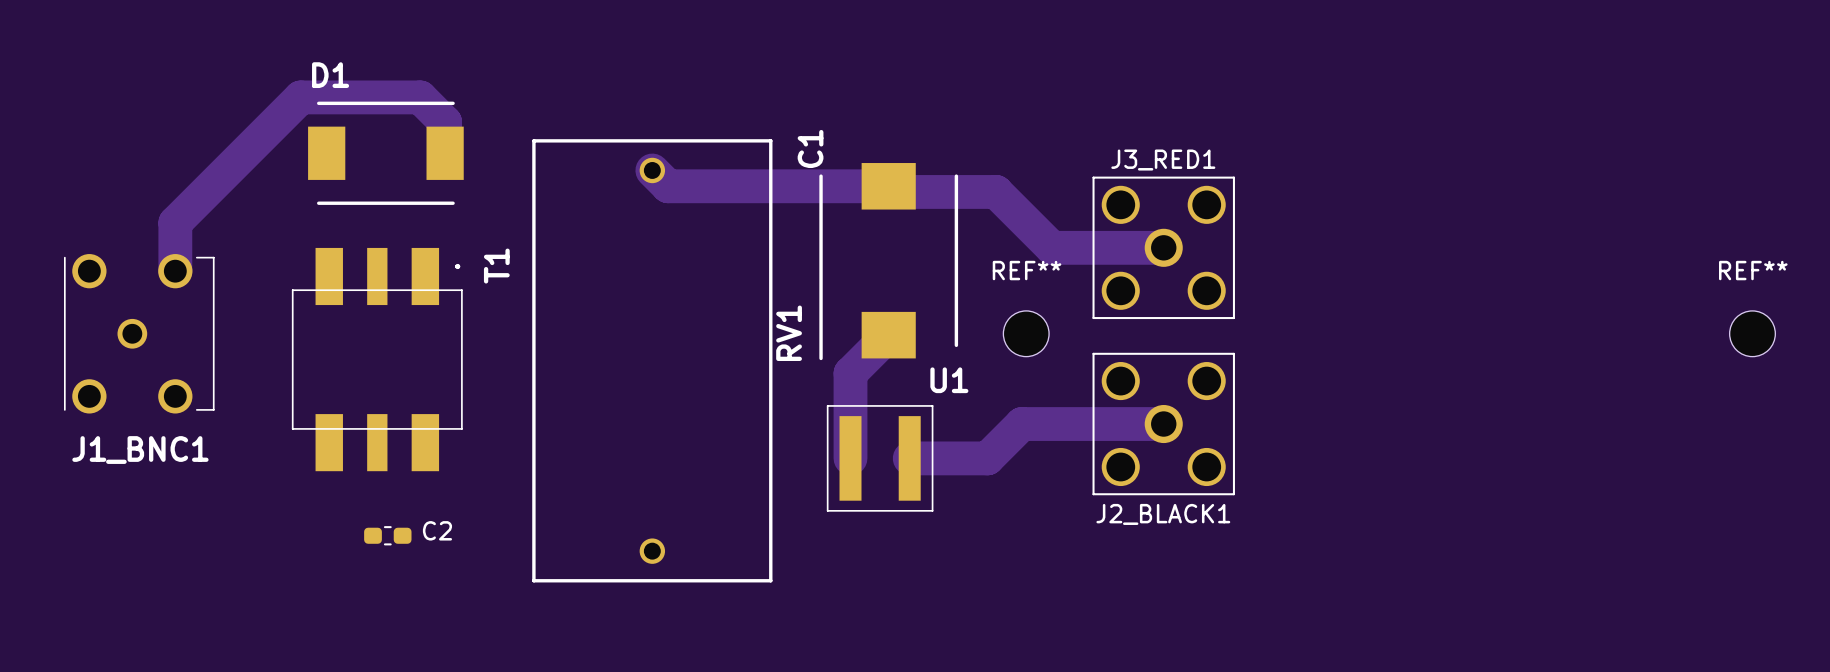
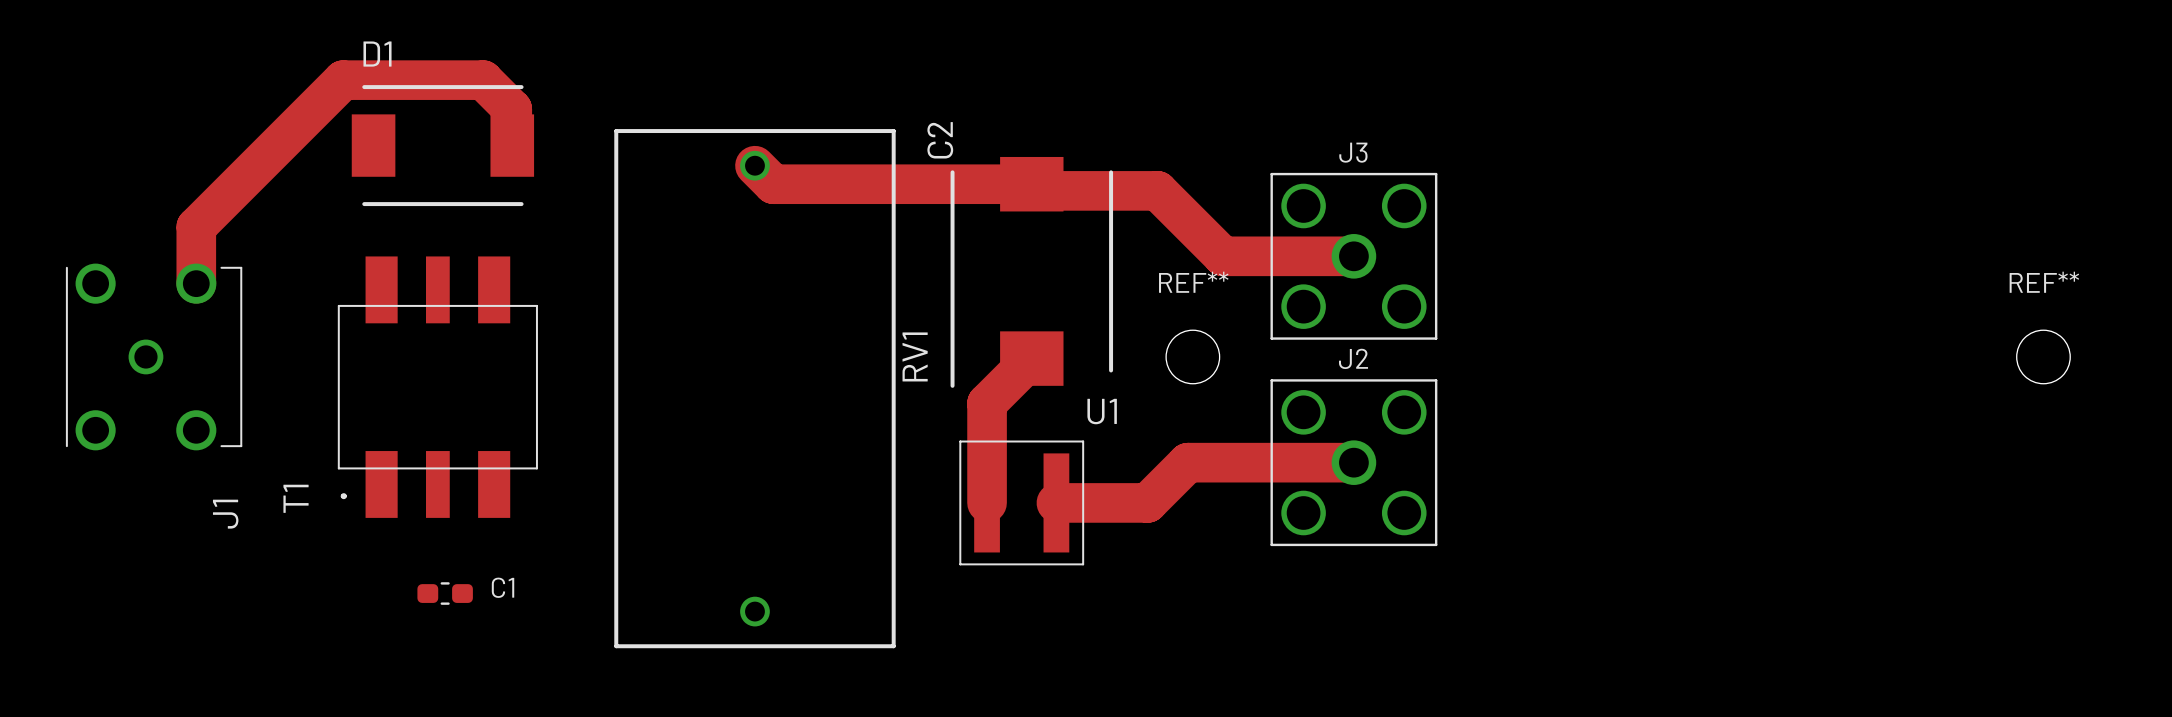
C1 name: C1 (810, 148) -> C2 (940, 140)
J3_RED1 name: J3_RED1 (1163, 160) -> J3 (1353, 152)
T1 rotation: 0° (377, 359) -> 180° (437, 387)
J1_BNC1 name: J1_BNC1 (140, 450) -> J1 (225, 514)
J2_BLACK1 name: J2_BLACK1 (1163, 514) -> J2 (1353, 358)
C2 name: C2 (437, 530) -> C1 (503, 587)

